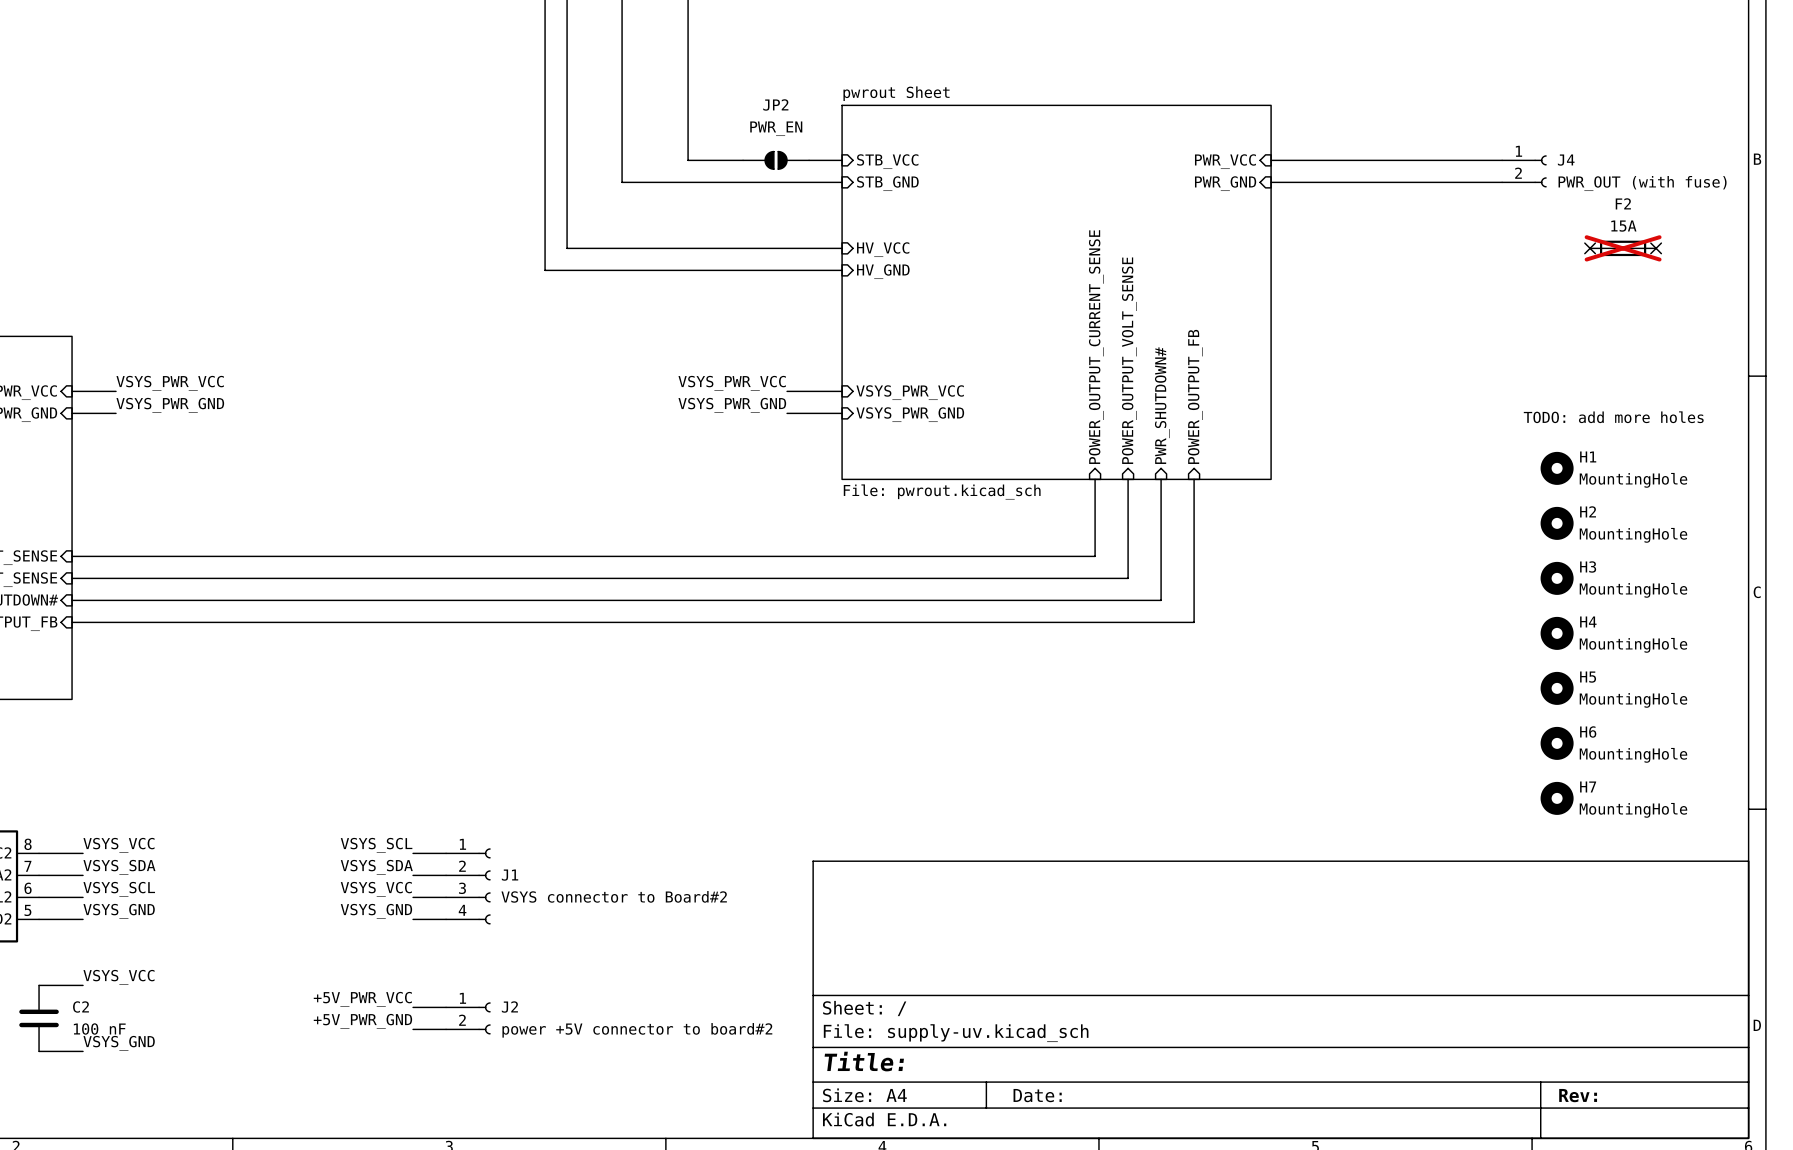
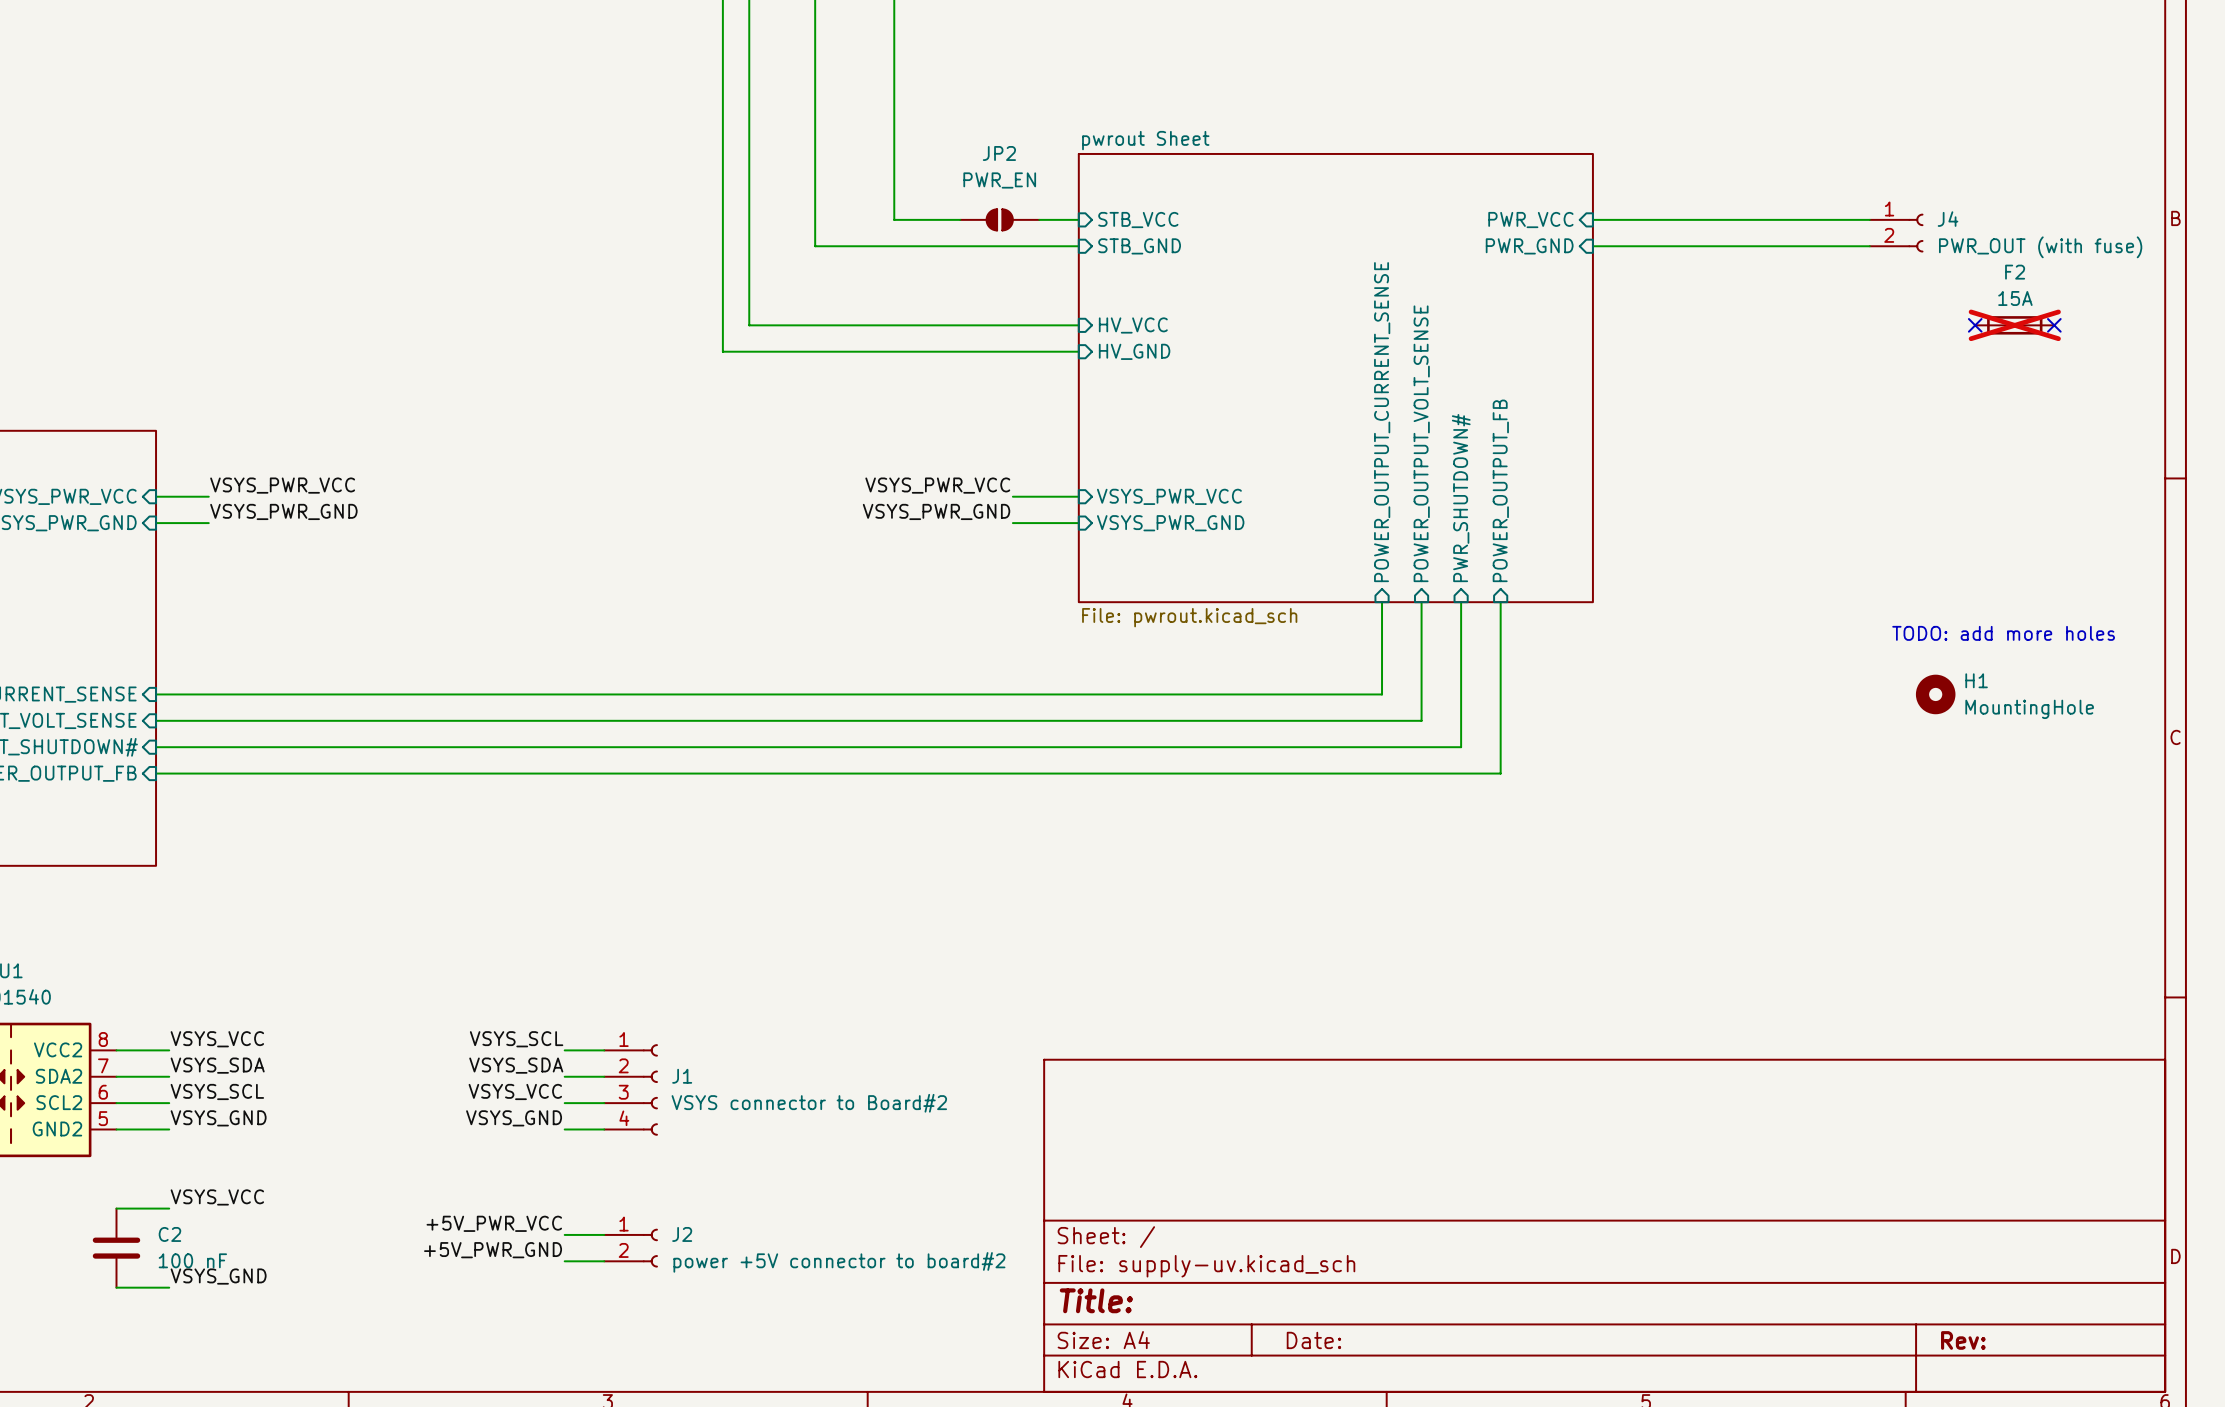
text position: TODO: add more holes (1613, 417) -> TODO: add more holes (2003, 633)
H1 position: (1557, 468) -> (1935, 694)
H2: MountingHole (1557, 523) -> none
H3: MountingHole (1557, 578) -> none
H4: MountingHole (1557, 633) -> none
H5: MountingHole (1557, 688) -> none
H6: MountingHole (1557, 743) -> none
H7: MountingHole (1557, 798) -> none

